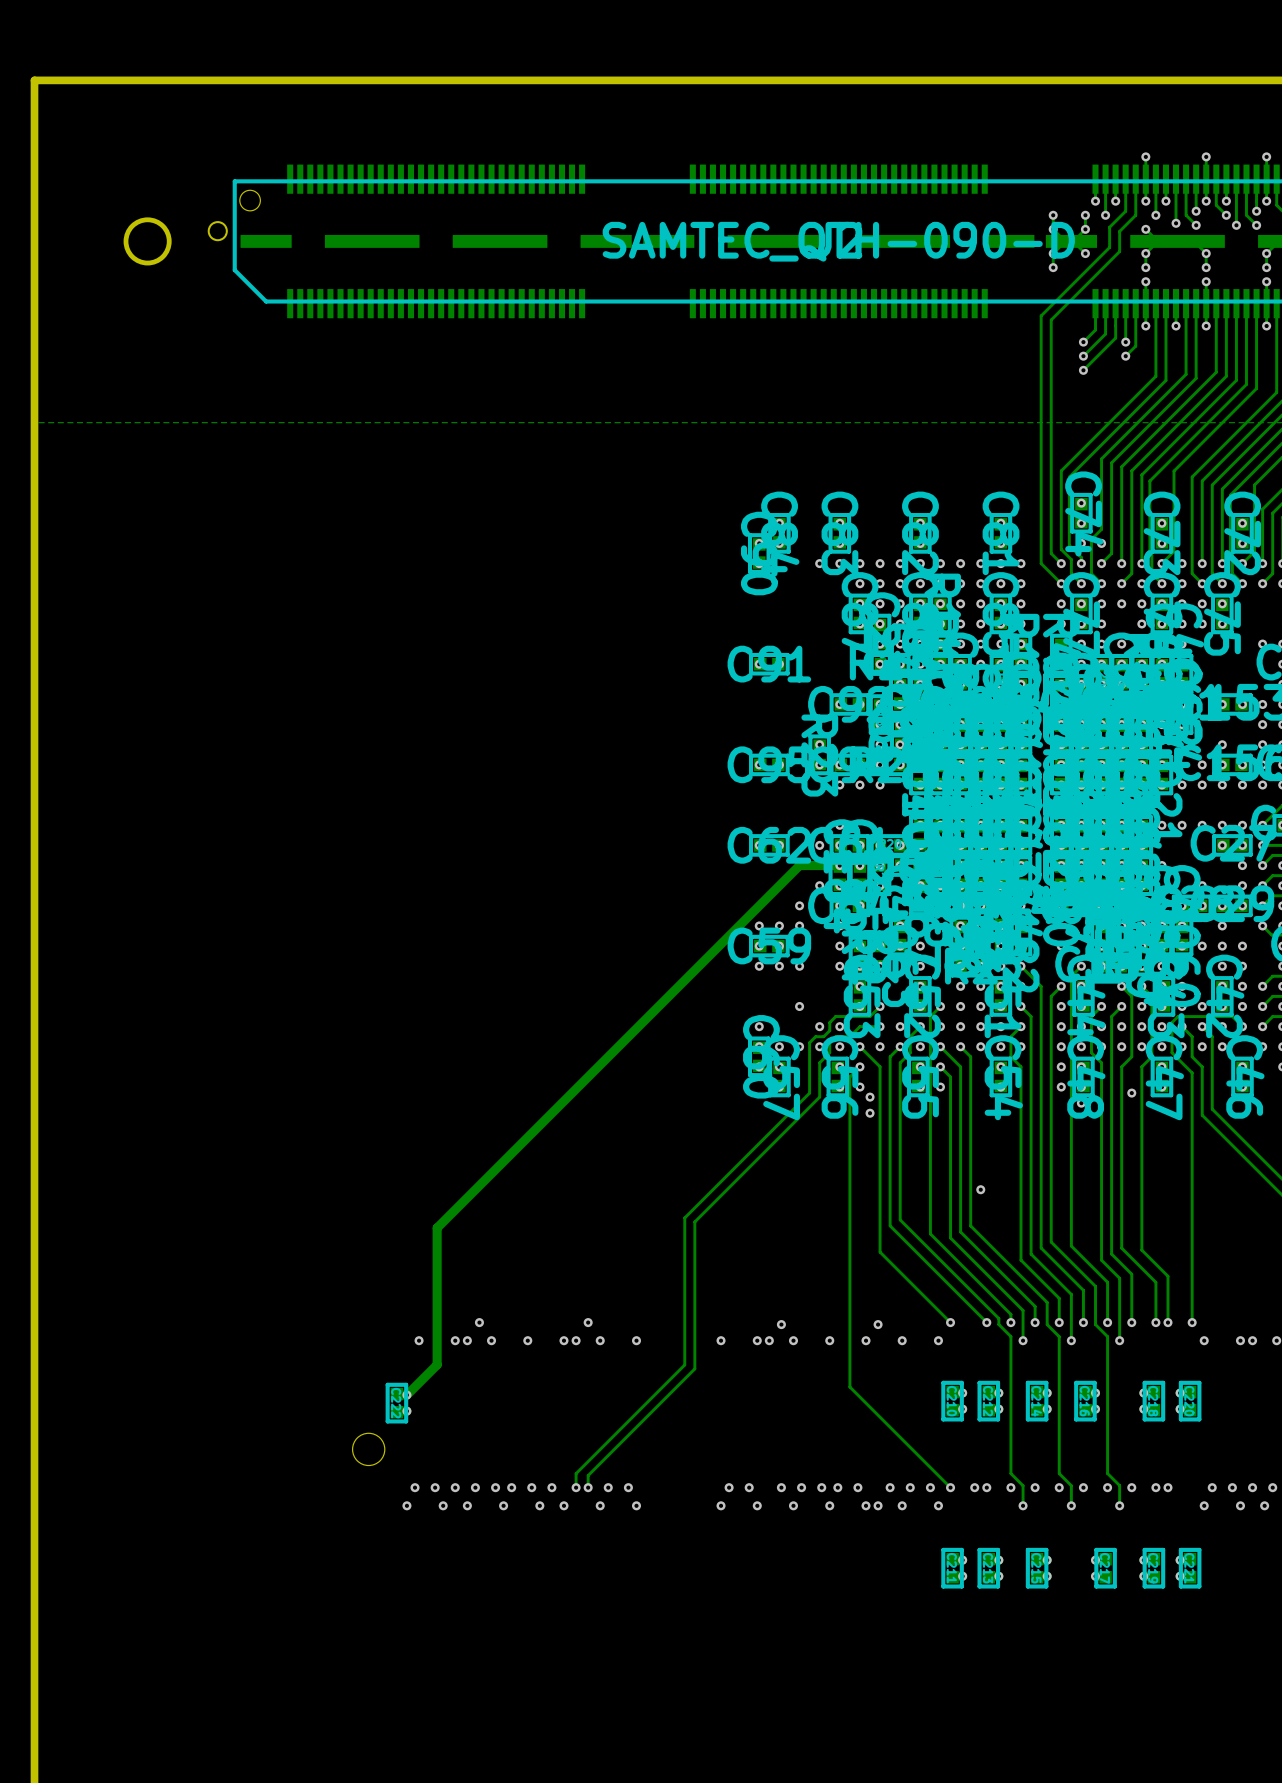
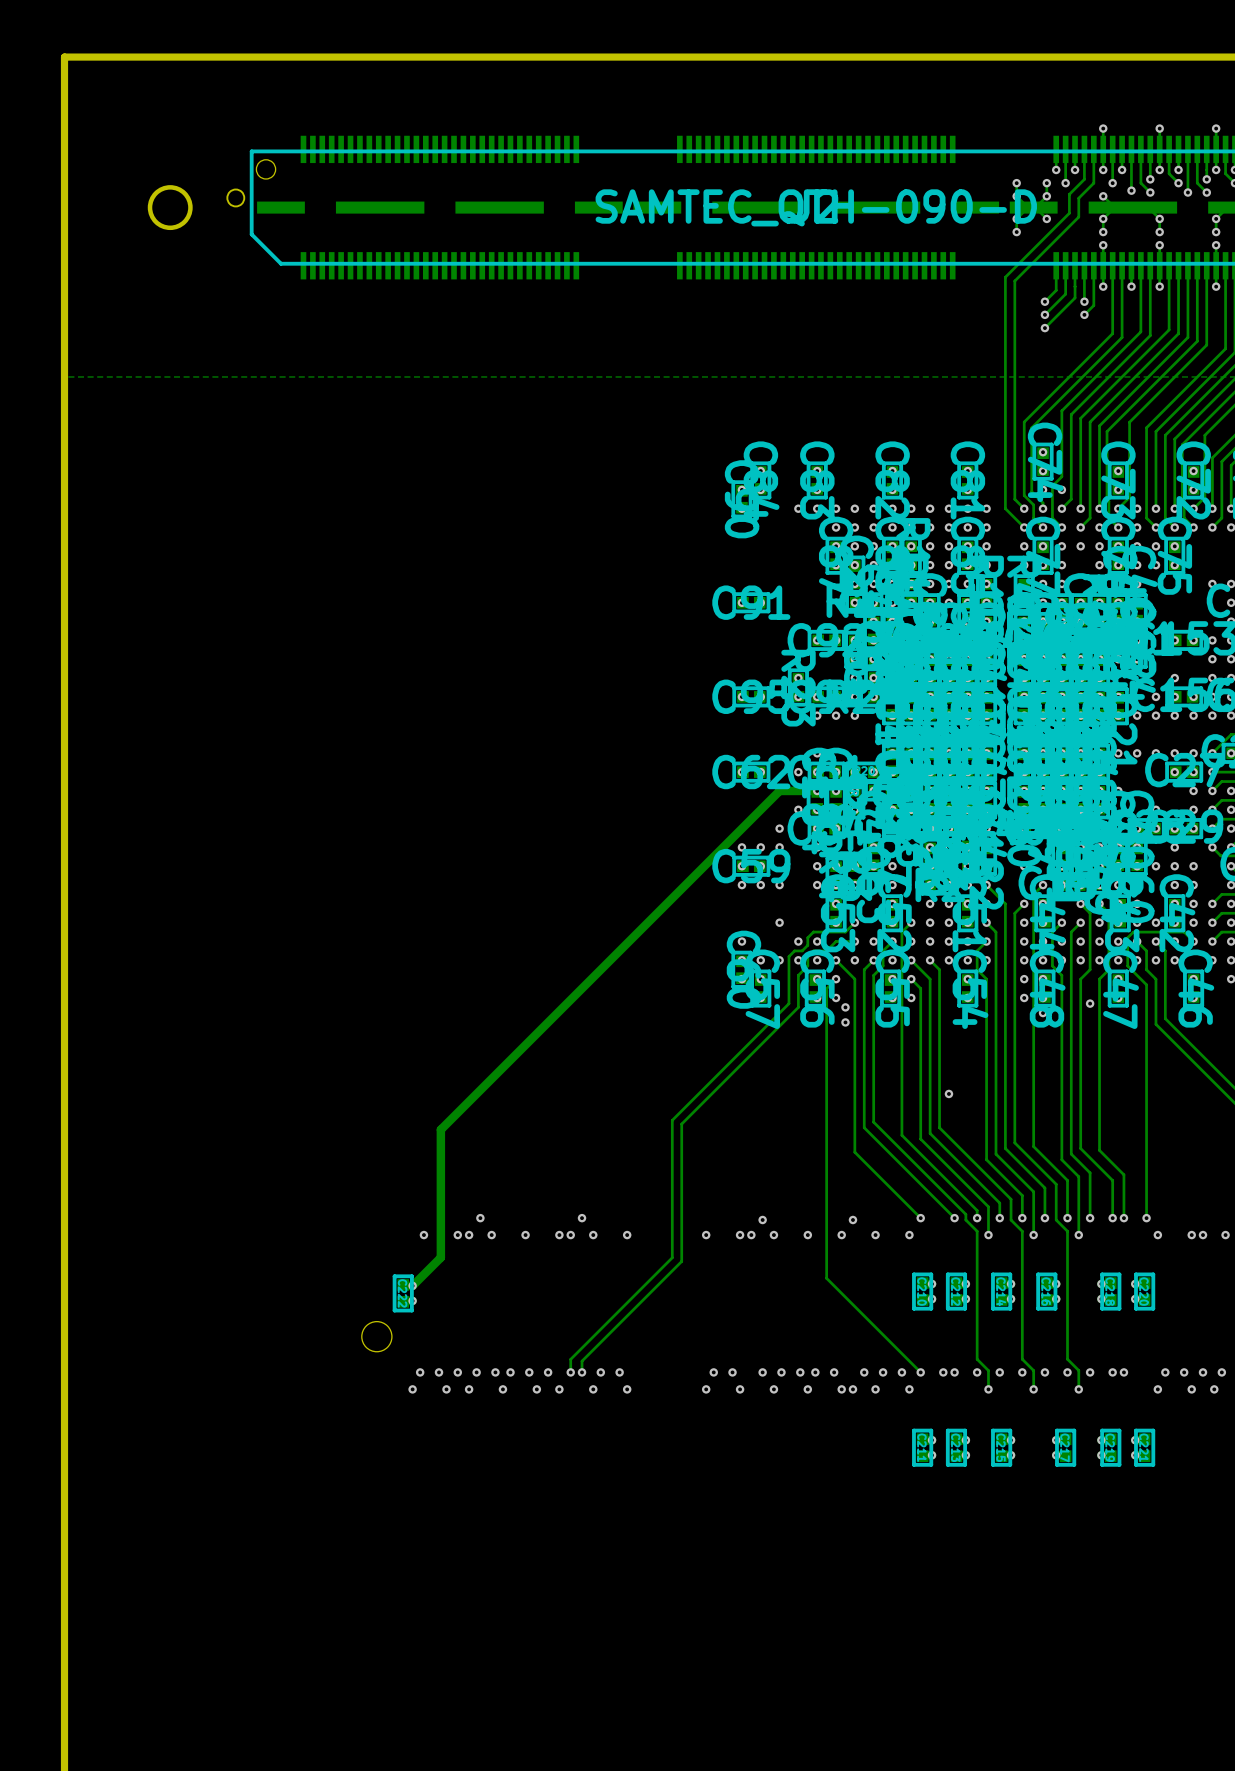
via: (1121, 644) -> none

